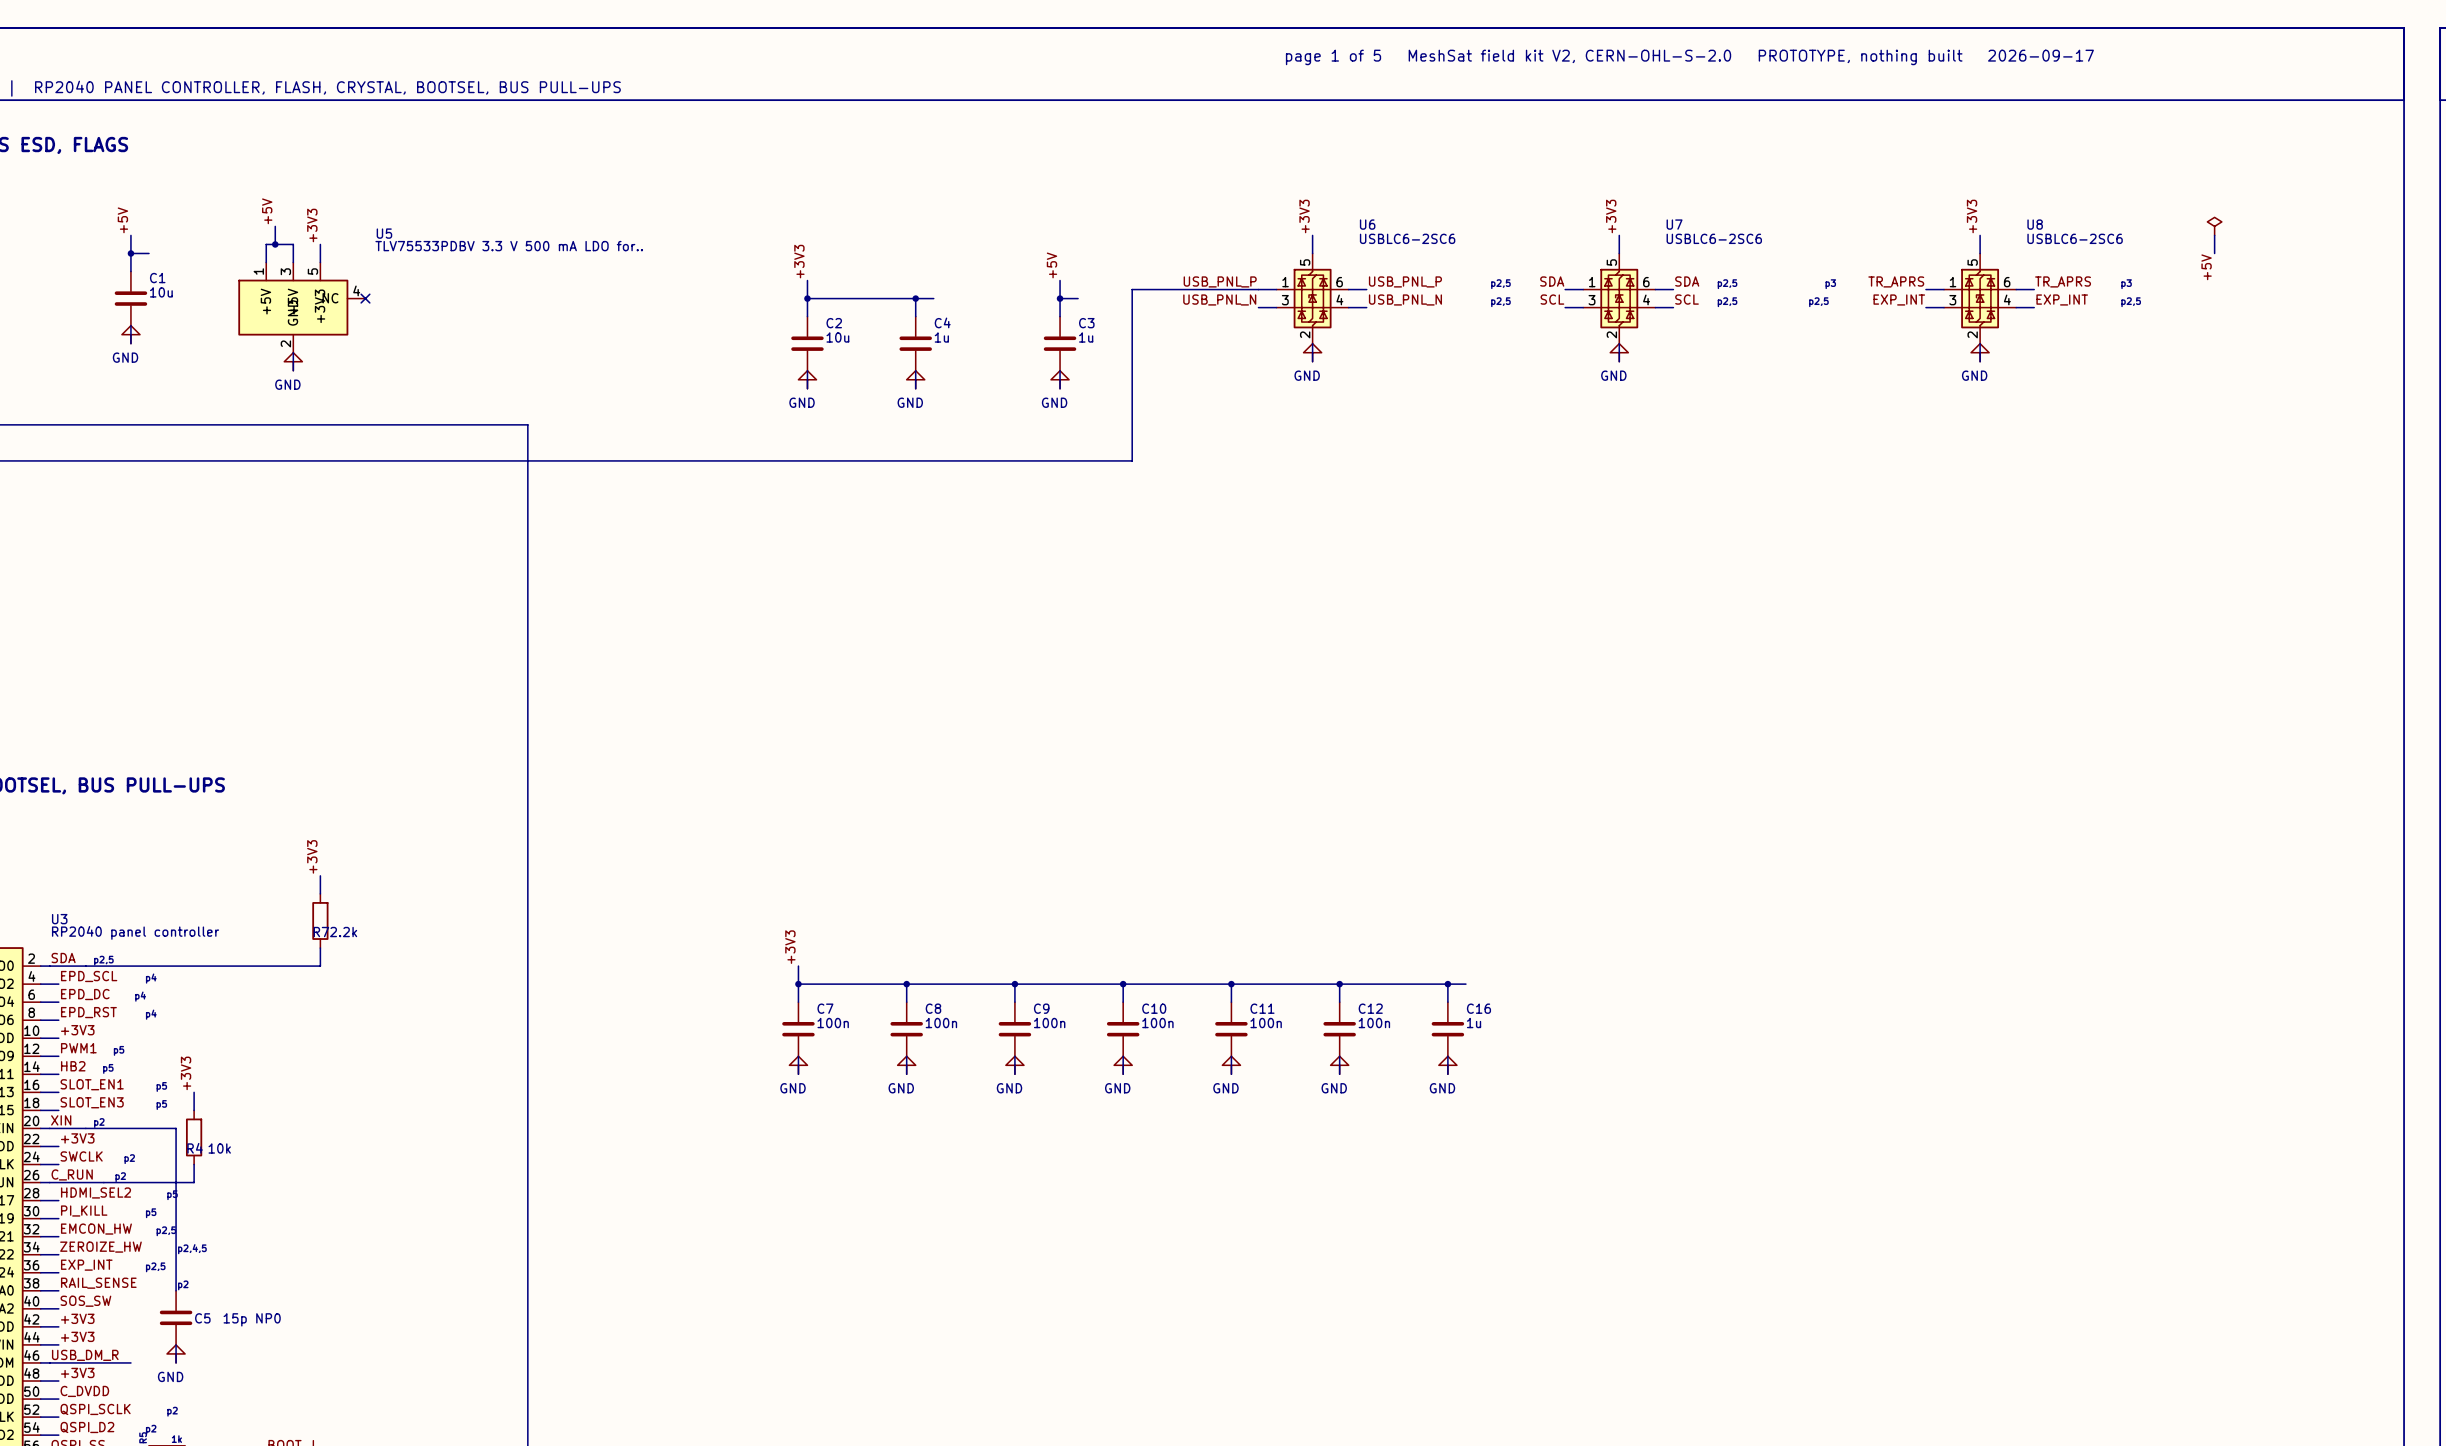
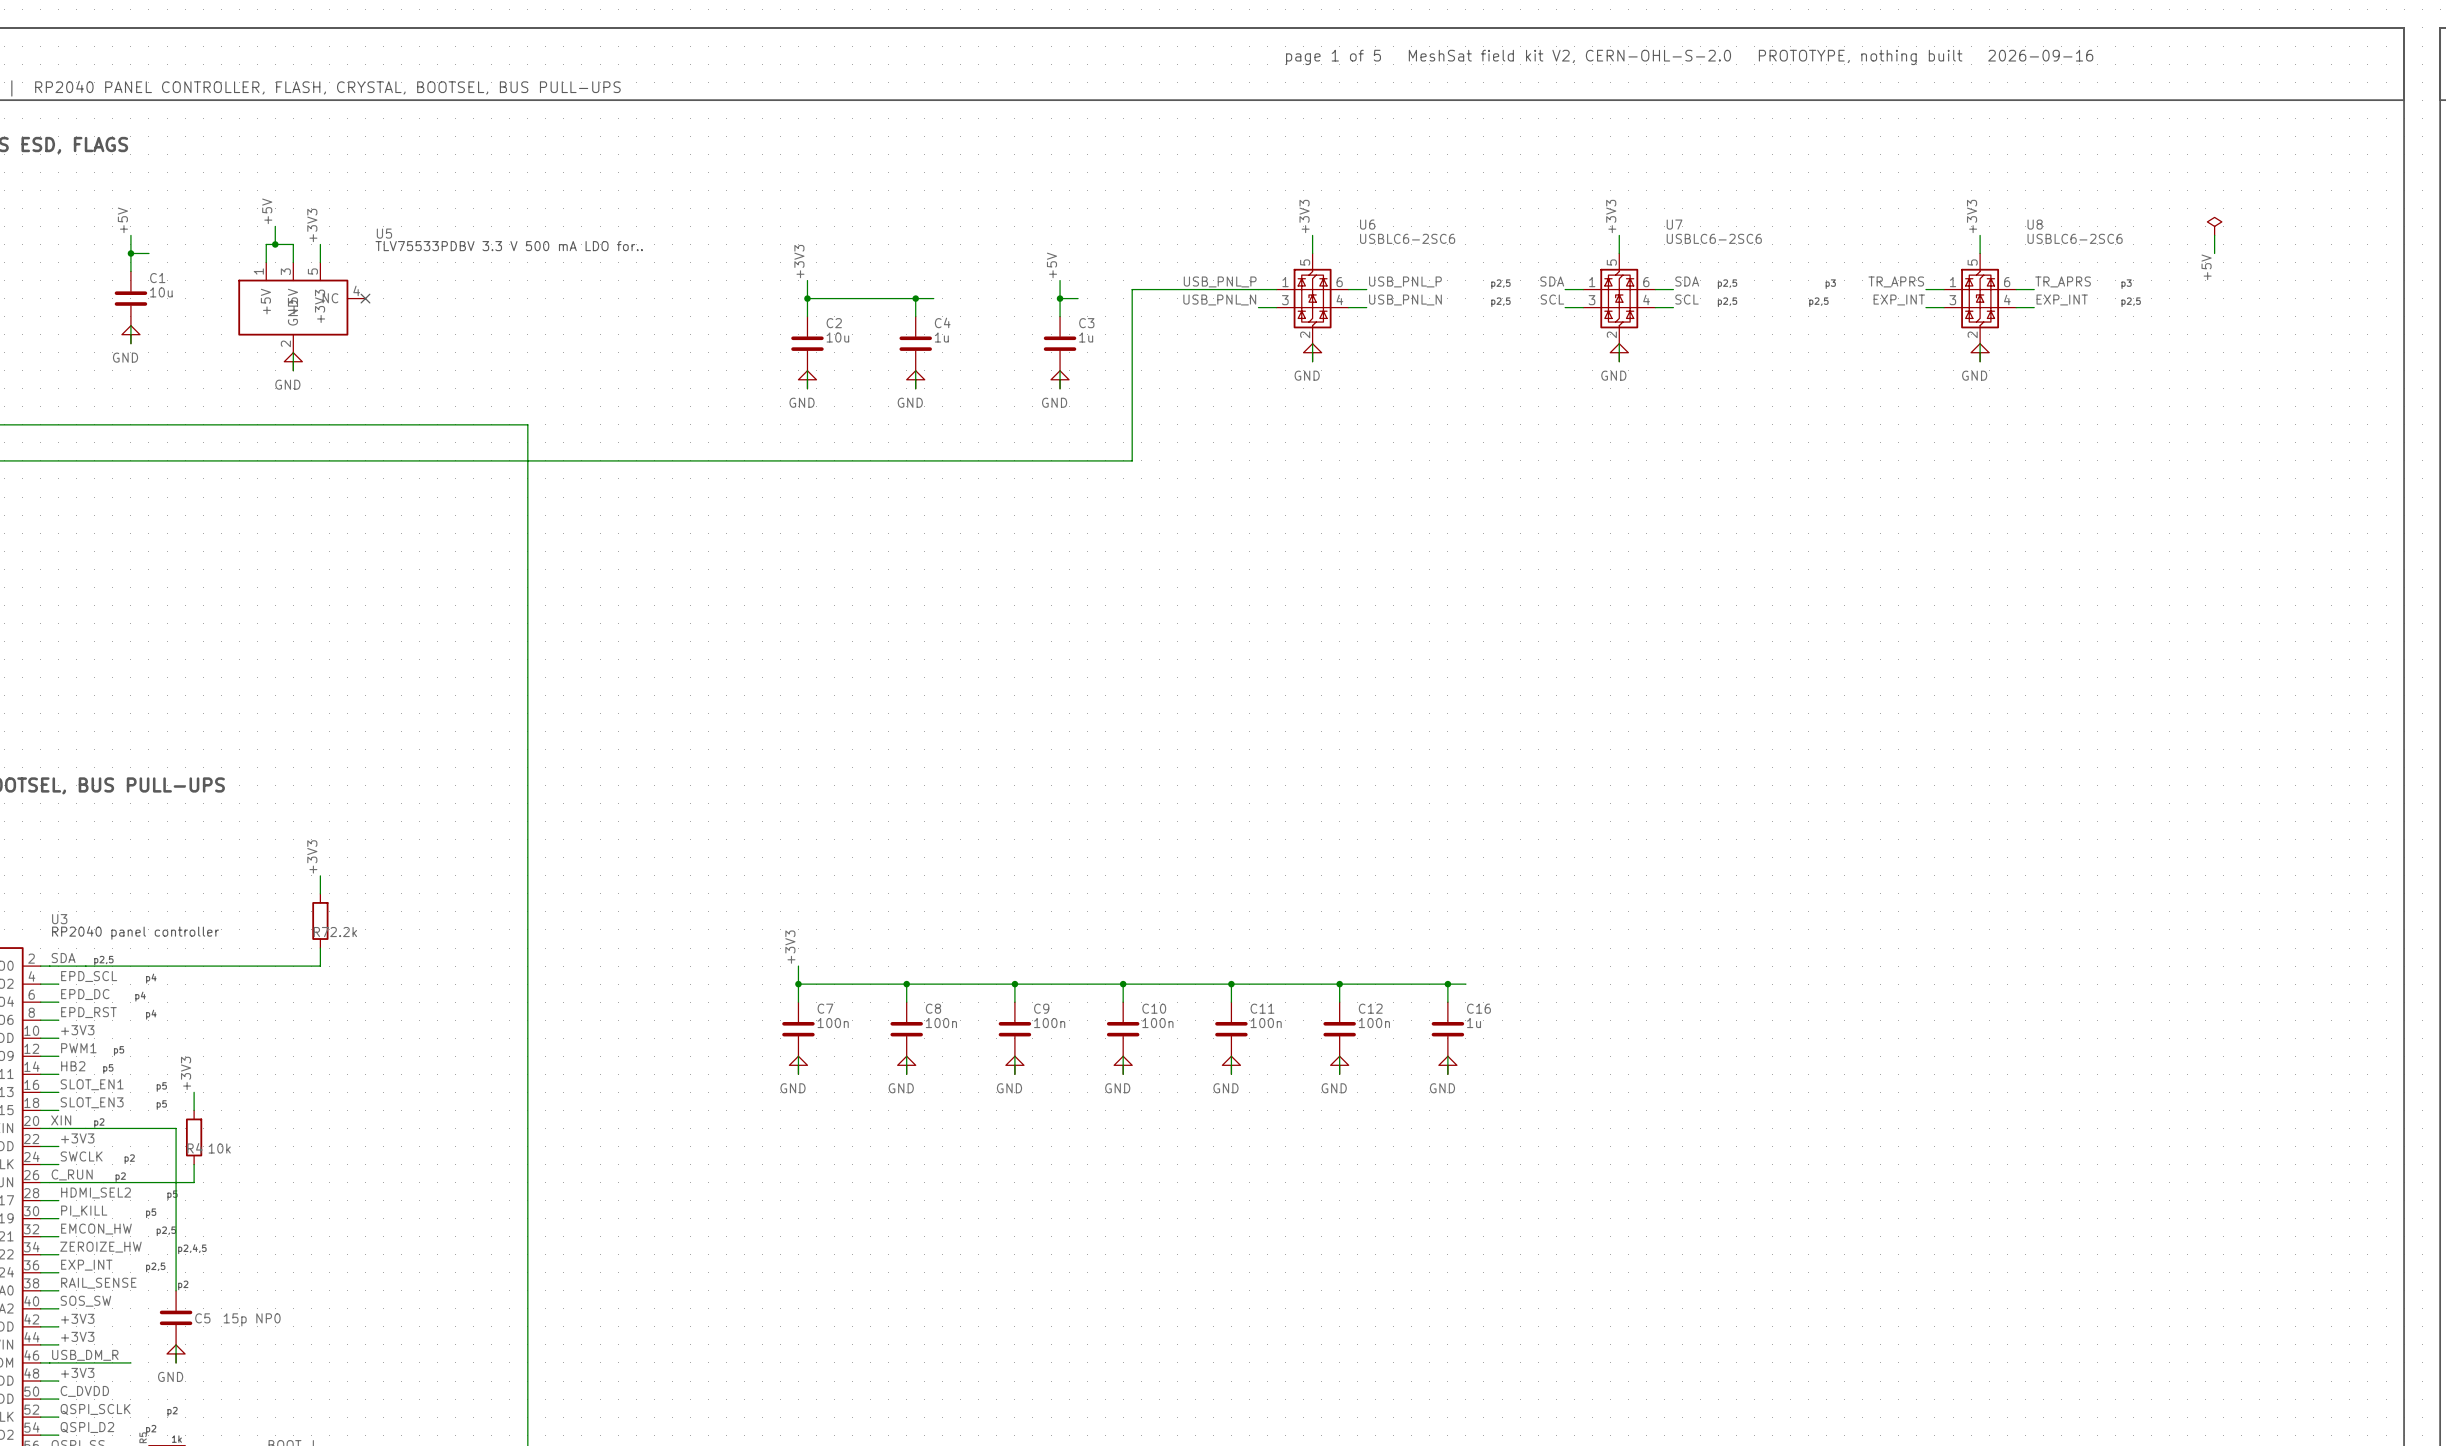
text: page 1 of 5 MeshSat field kit V2, CERN-OHL-S-2.0 PROTOTYPE, nothing built 2026-09-17 (1689, 57) -> page 1 of 5 MeshSat field kit V2, CERN-OHL-S-2.0 PROTOTYPE, nothing built 2026-09-16 (1689, 57)

